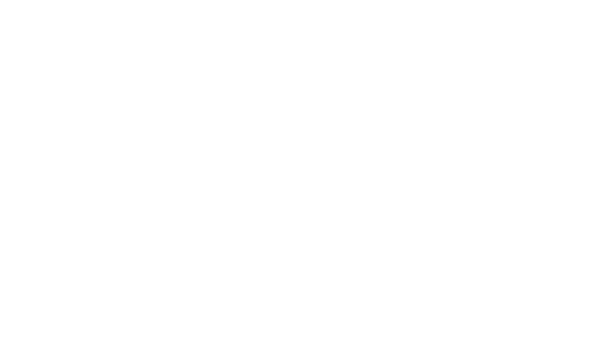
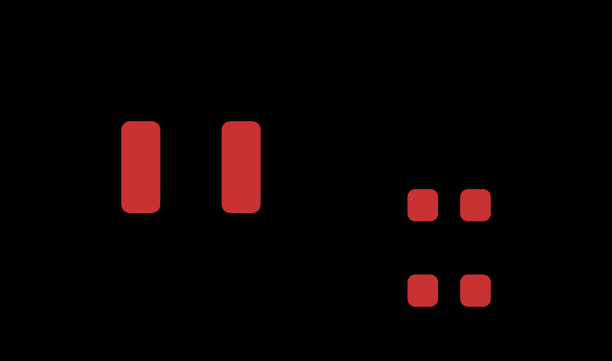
part: none -> (190, 167)
part: none -> (449, 205)
part: none -> (449, 290)

